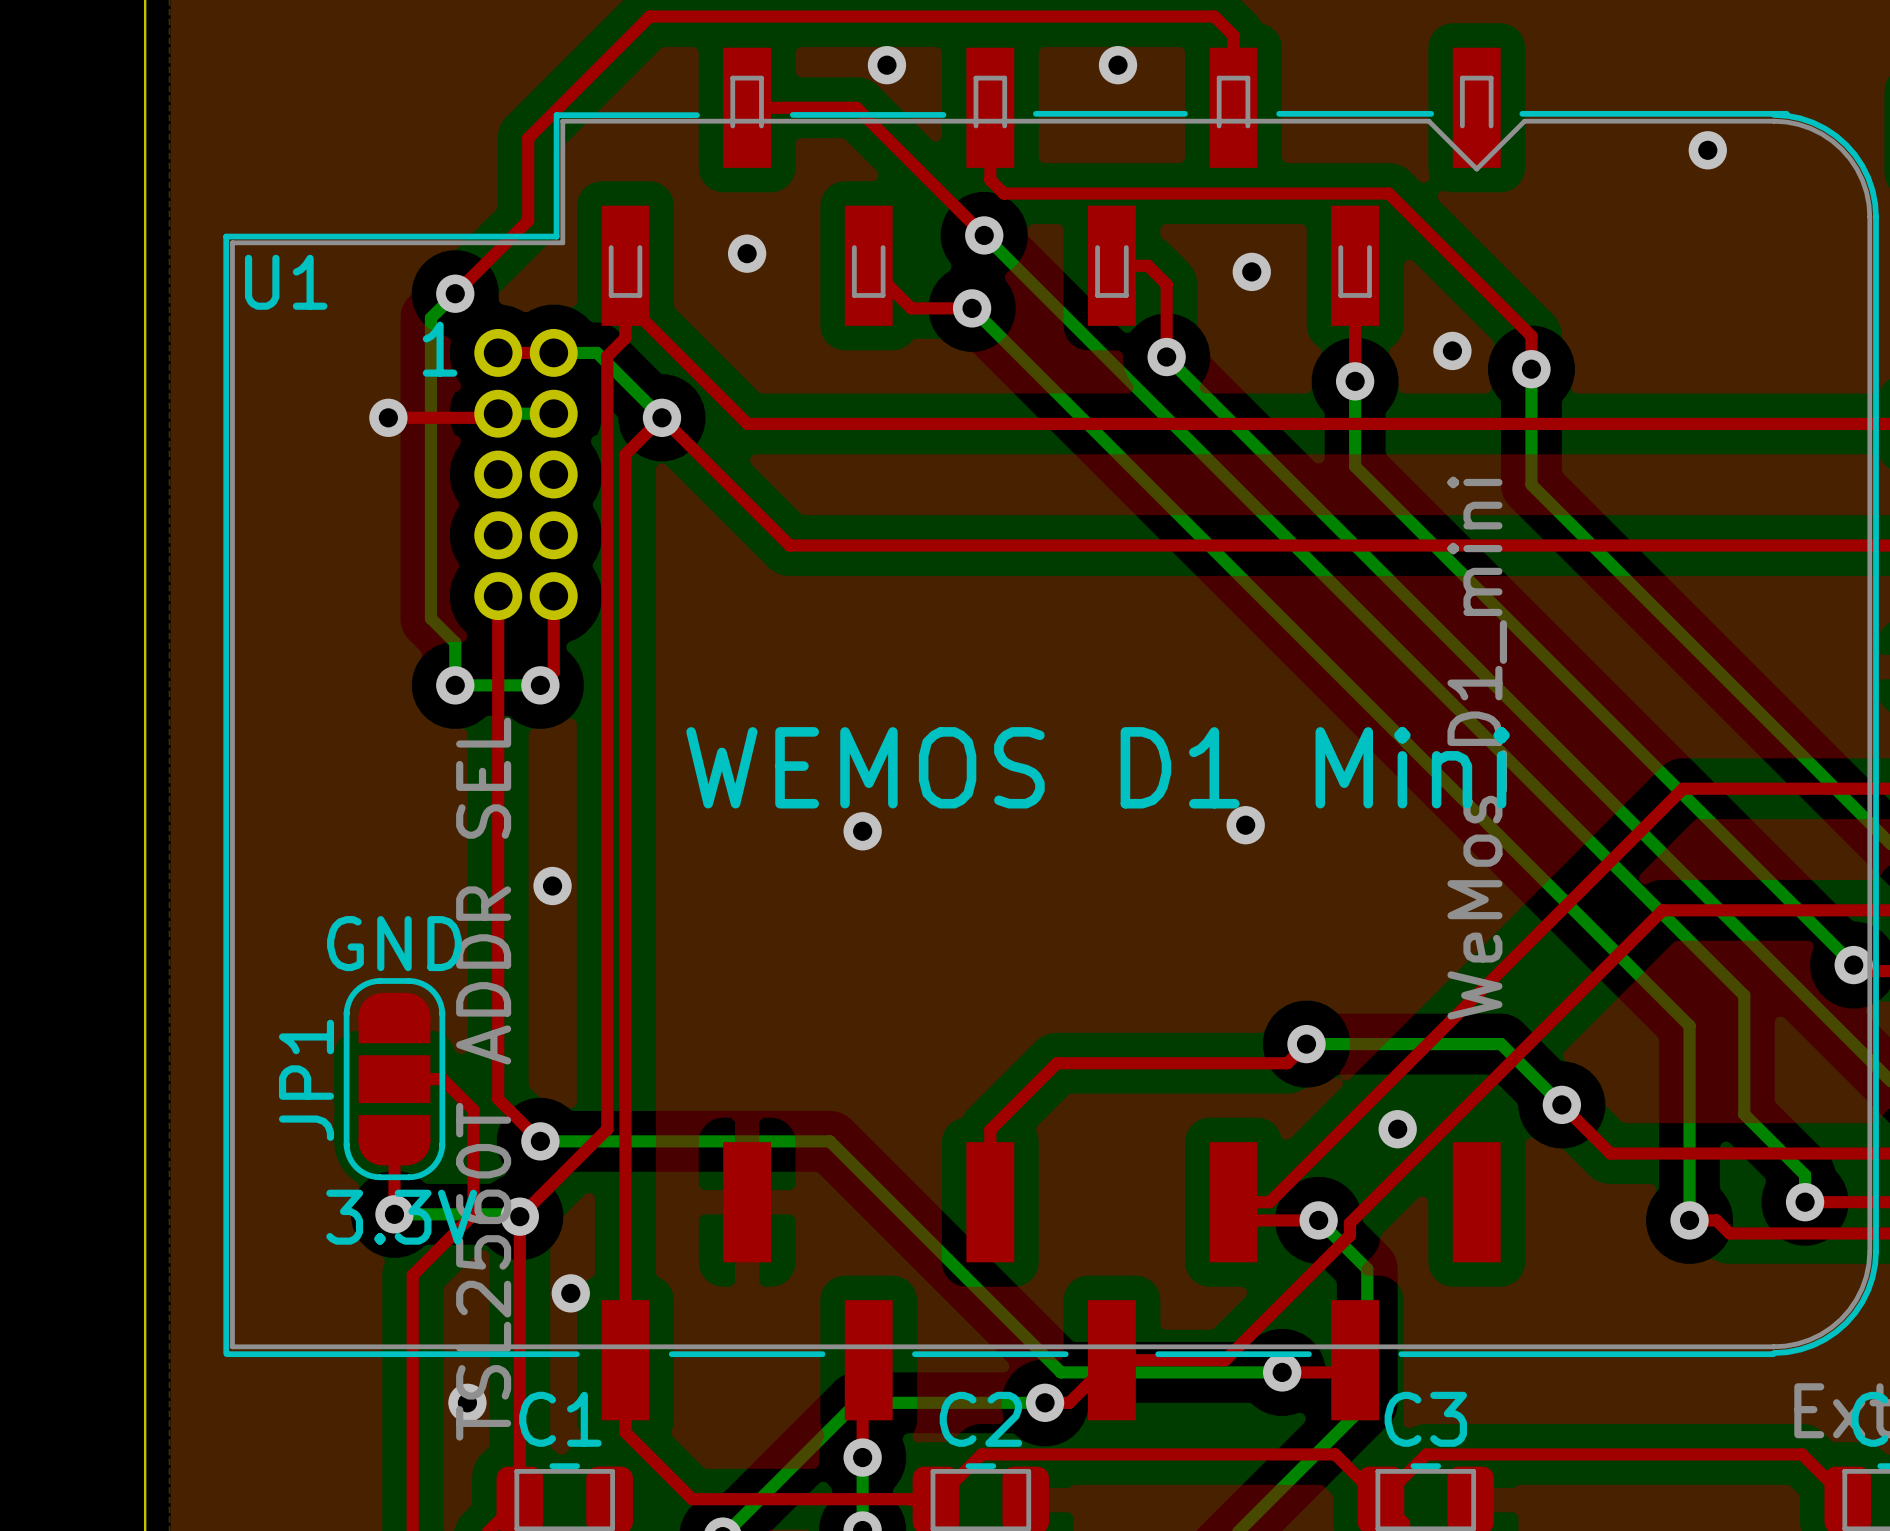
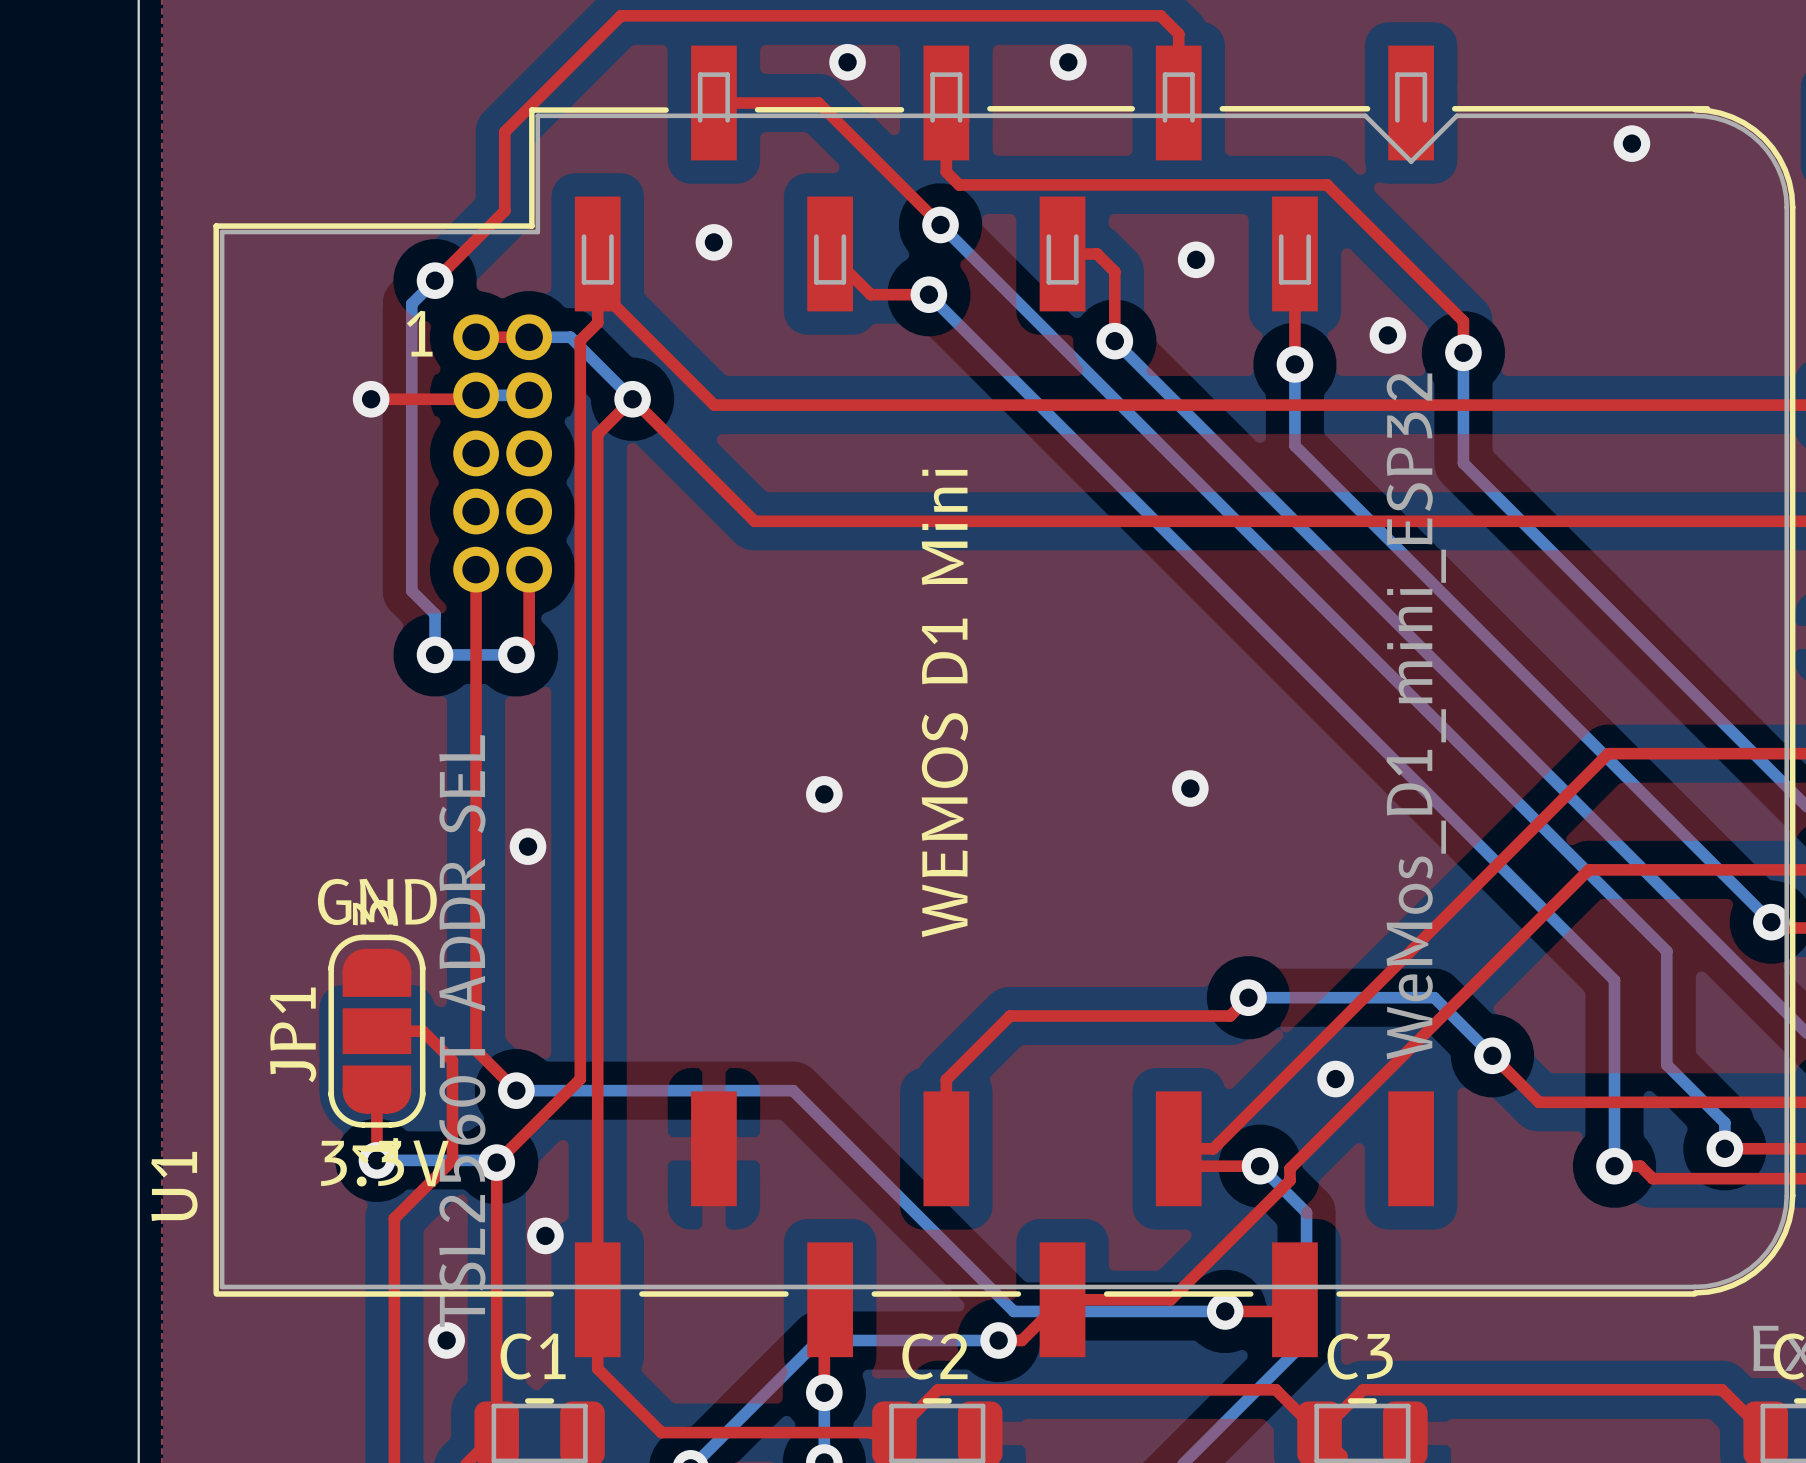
U1 footprint: [223, 47, 1879, 1421] -> [213, 45, 1796, 1358]
U1 name position: U1 (286, 282) -> U1 (174, 1186)
U1 value: WeMos_D1_mini (1477, 748) -> WeMos_D1_mini_ESP32 (1416, 716)
JP1 footprint: [343, 978, 446, 1181] -> [328, 934, 426, 1128]

